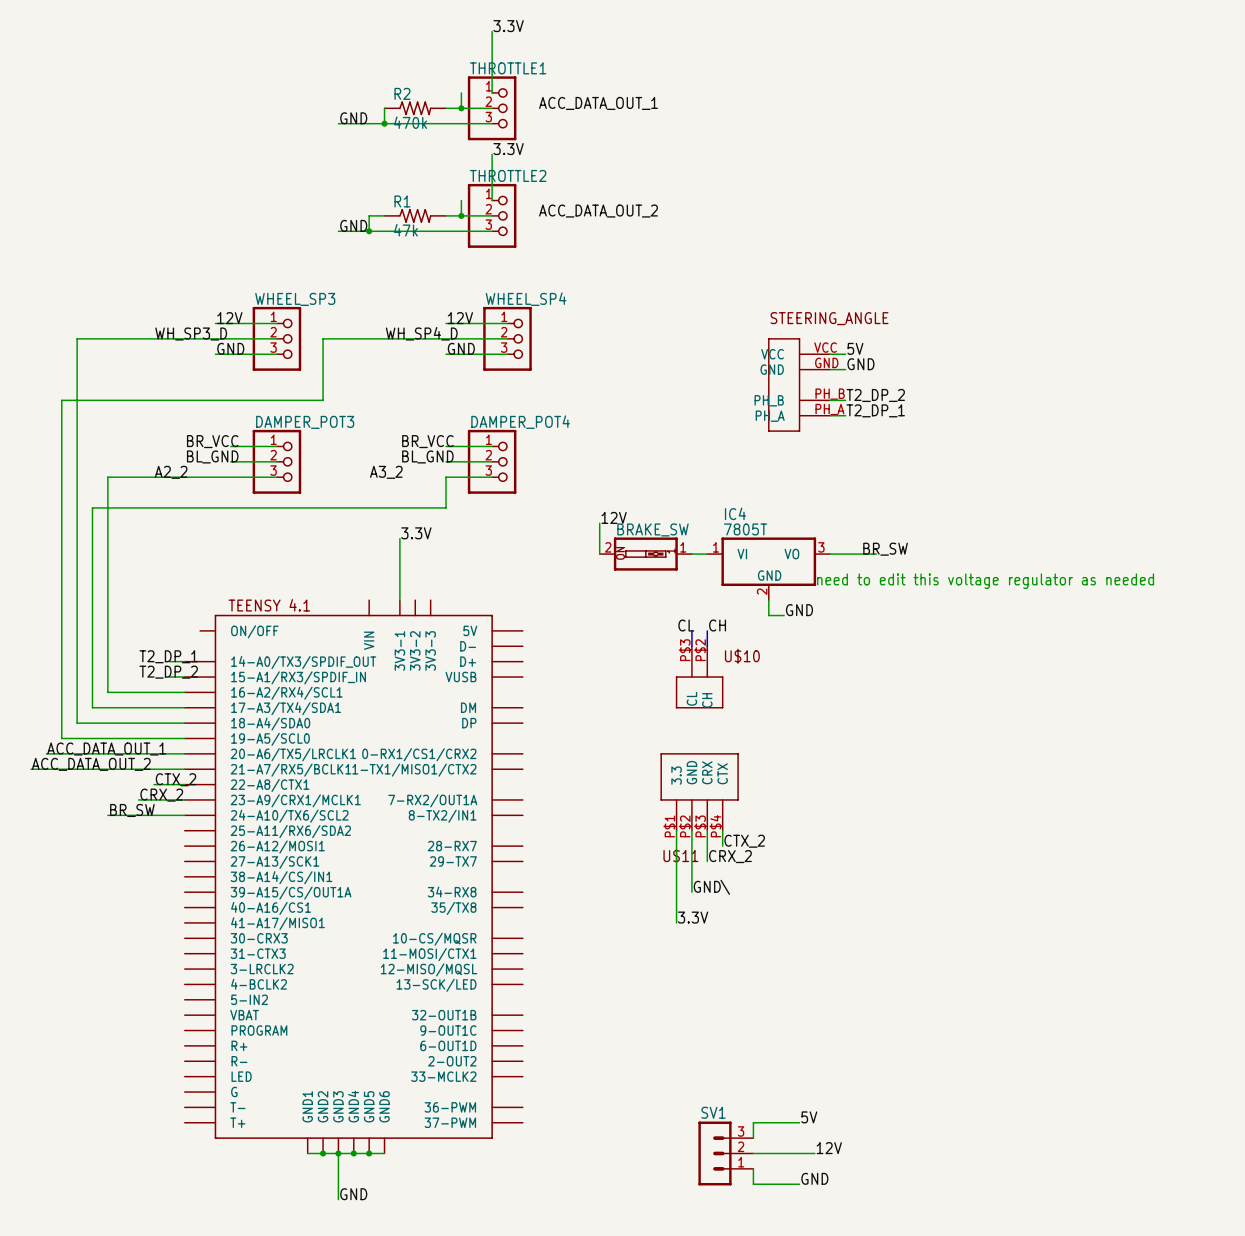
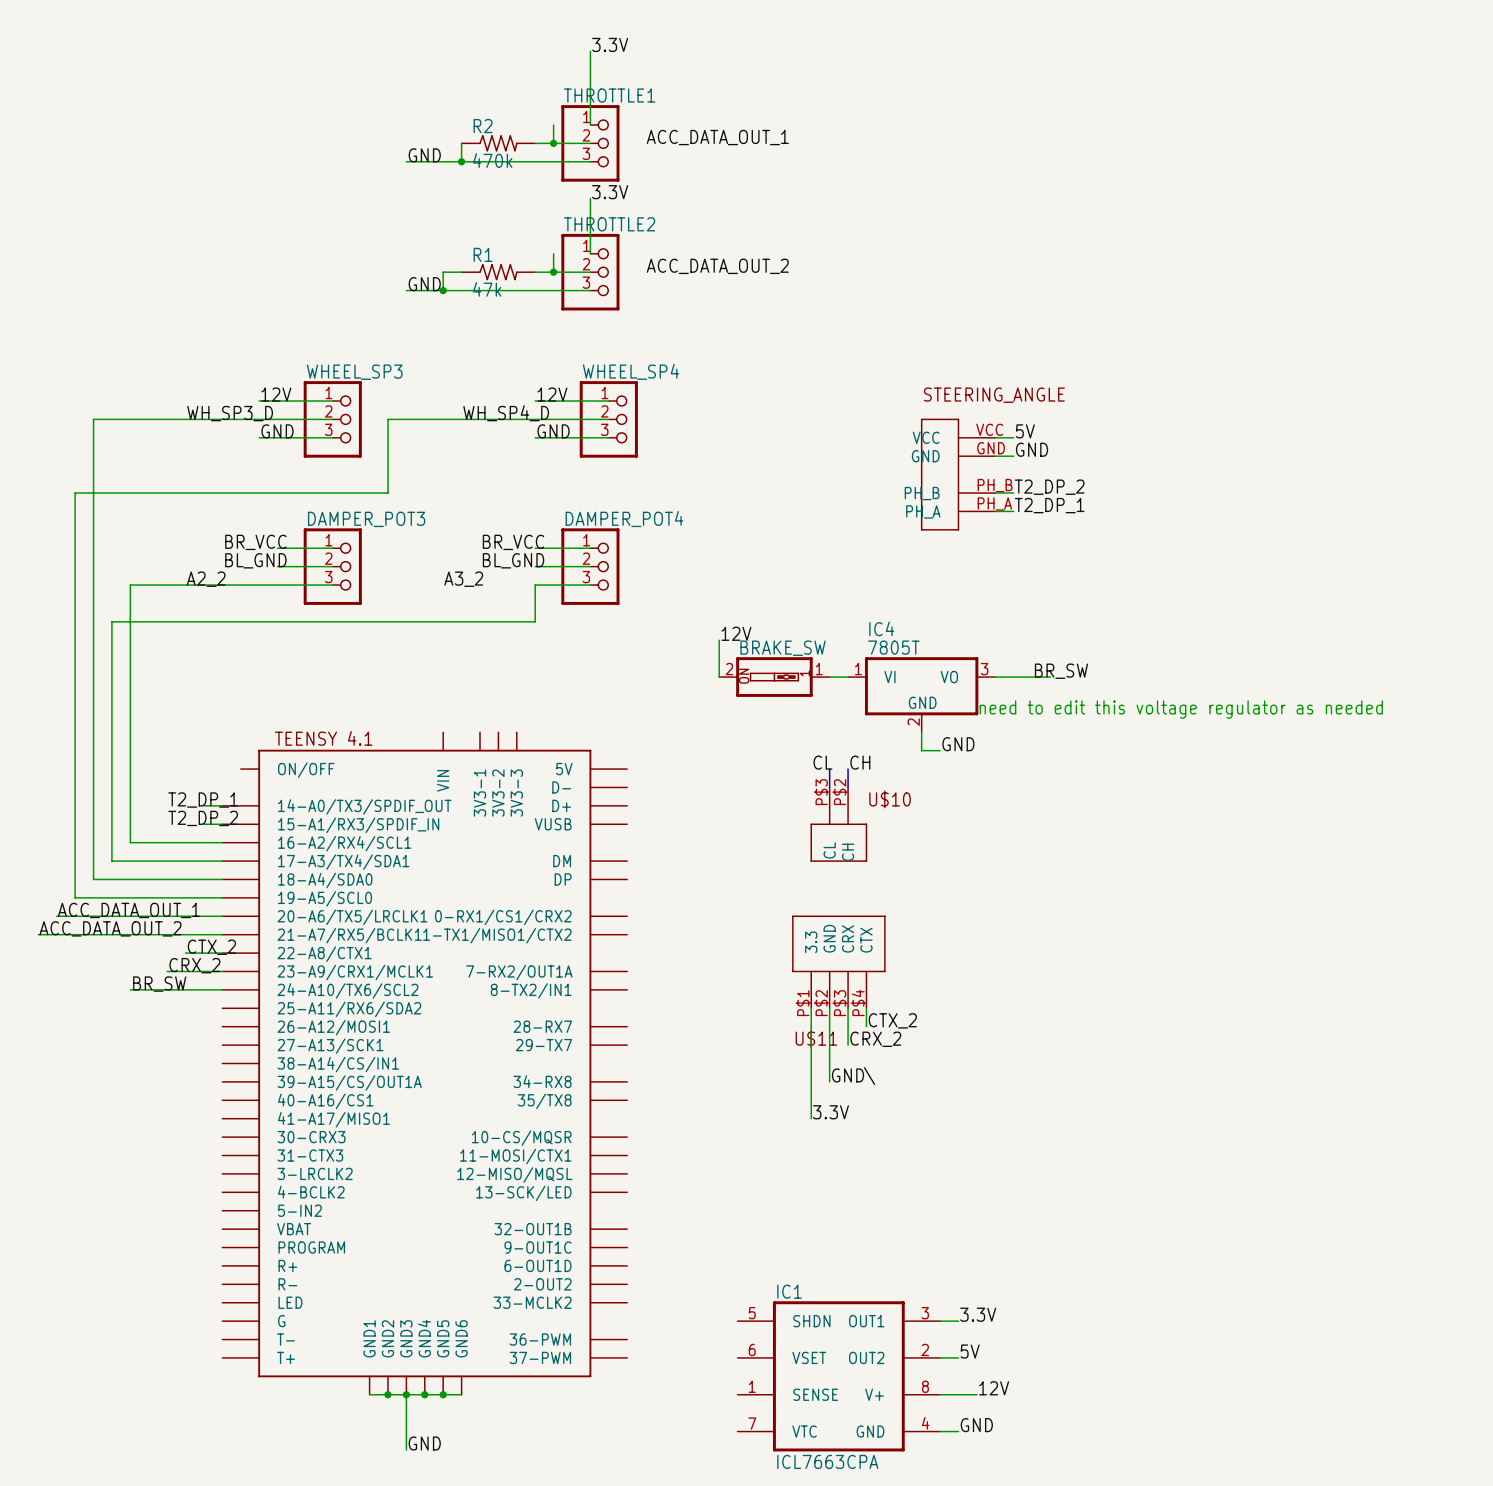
label: 3.3V (416, 533) -> none
wire: (399, 538) (399, 600) -> none
label: none -> 3.3V (978, 1314)
wire: none -> (940, 1321) (958, 1321)
IC1: none -> ICL7663CPA (838, 1376)
SV1: (725, 1153) -> none

